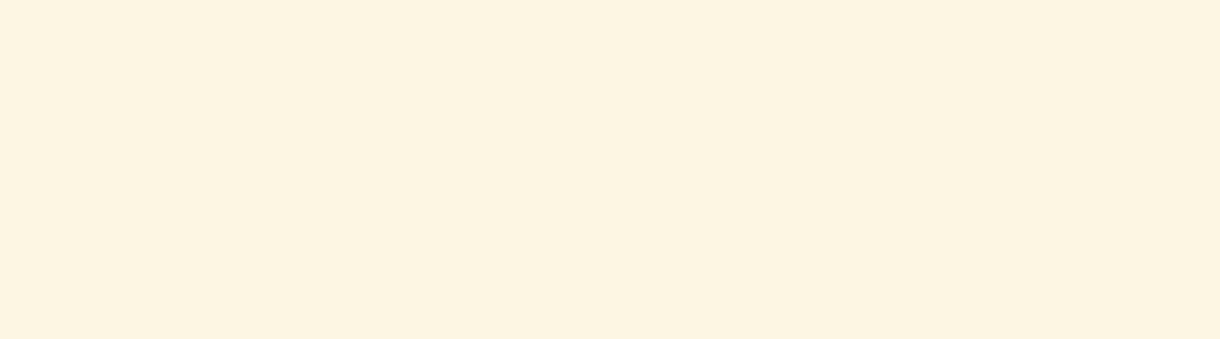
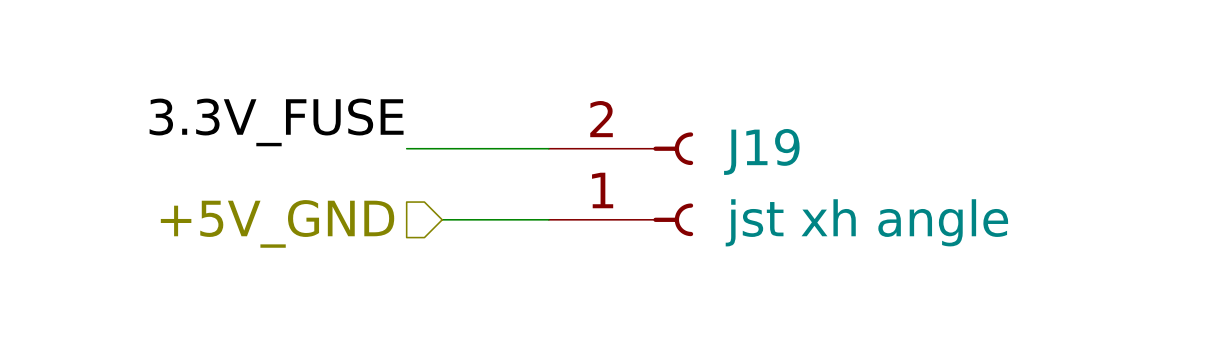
label: none -> 3.3V_FUSE (276, 122)
wire: none -> (406, 148) (548, 148)
J19: none -> jst xh angle (621, 184)
wire: none -> (442, 219) (548, 219)
hierarchical label: none -> +5V_GND (277, 223)

